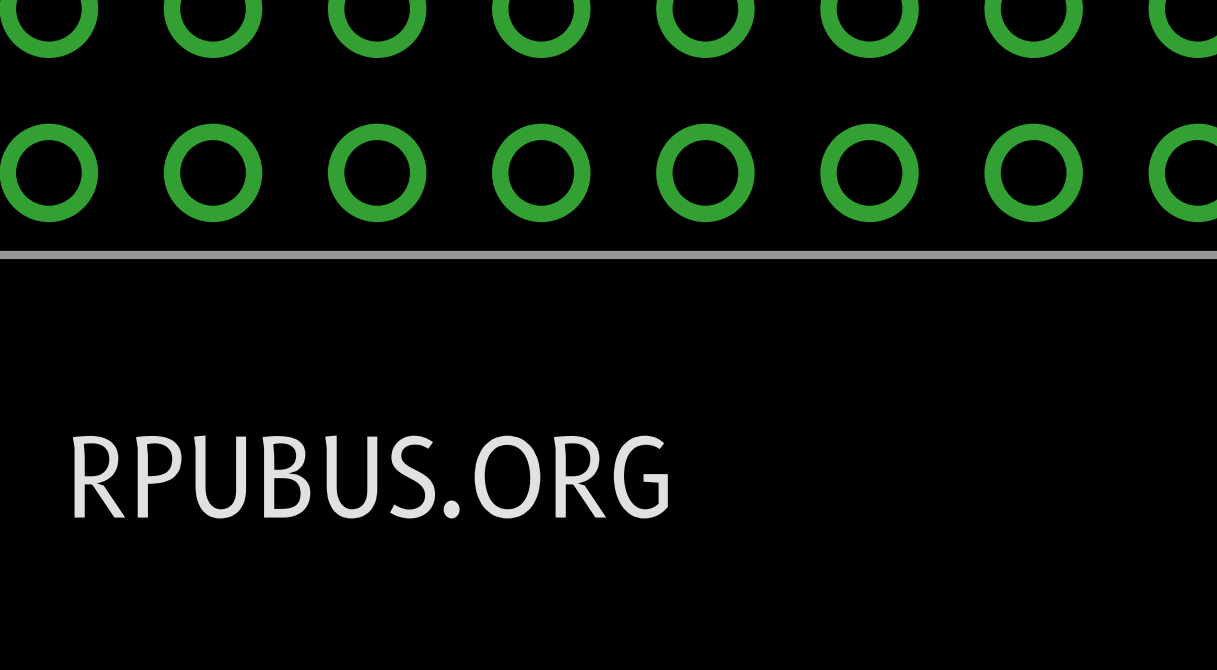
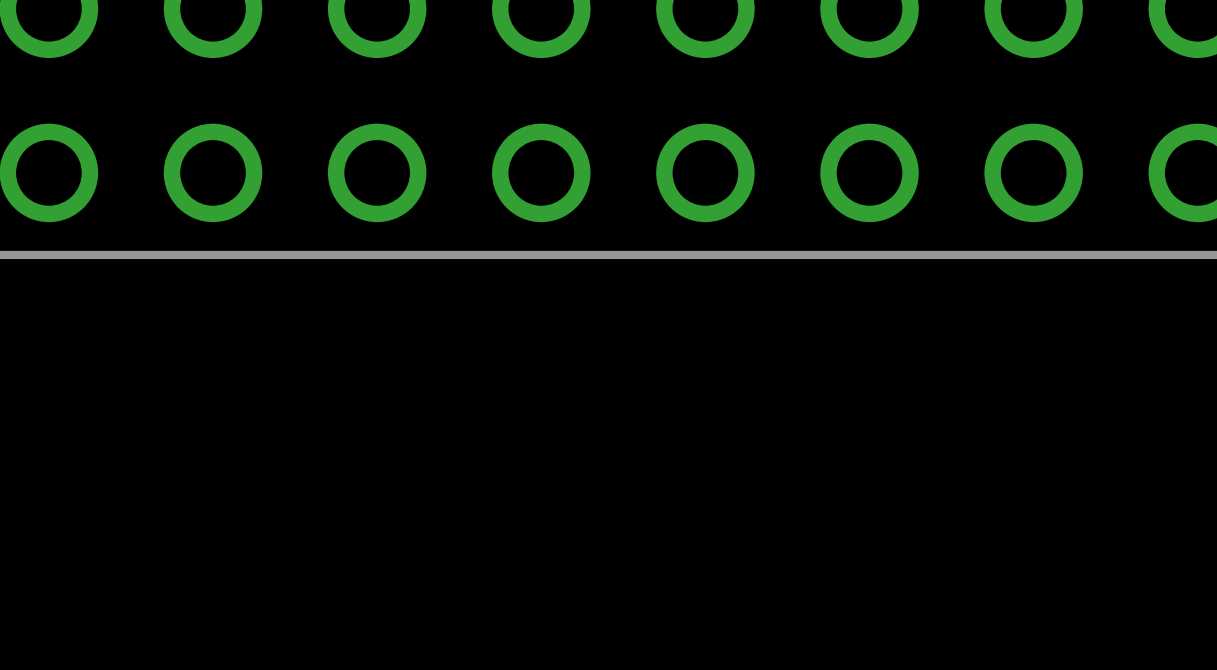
text: RPUBUS.ORG (370, 476) -> none

